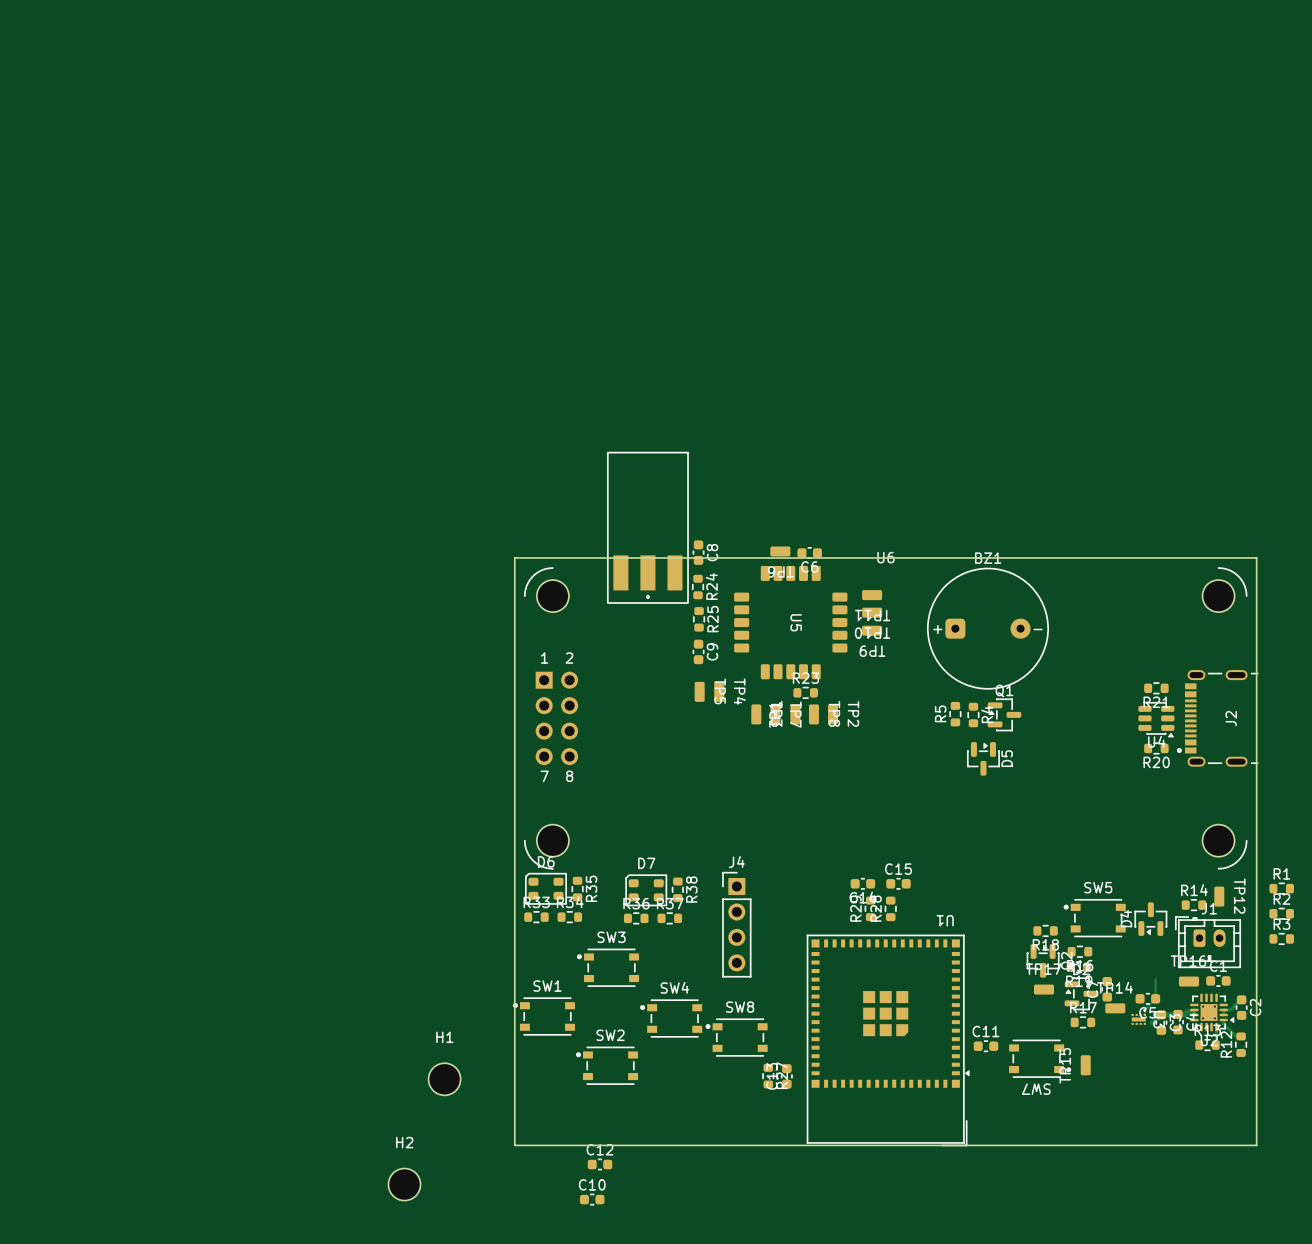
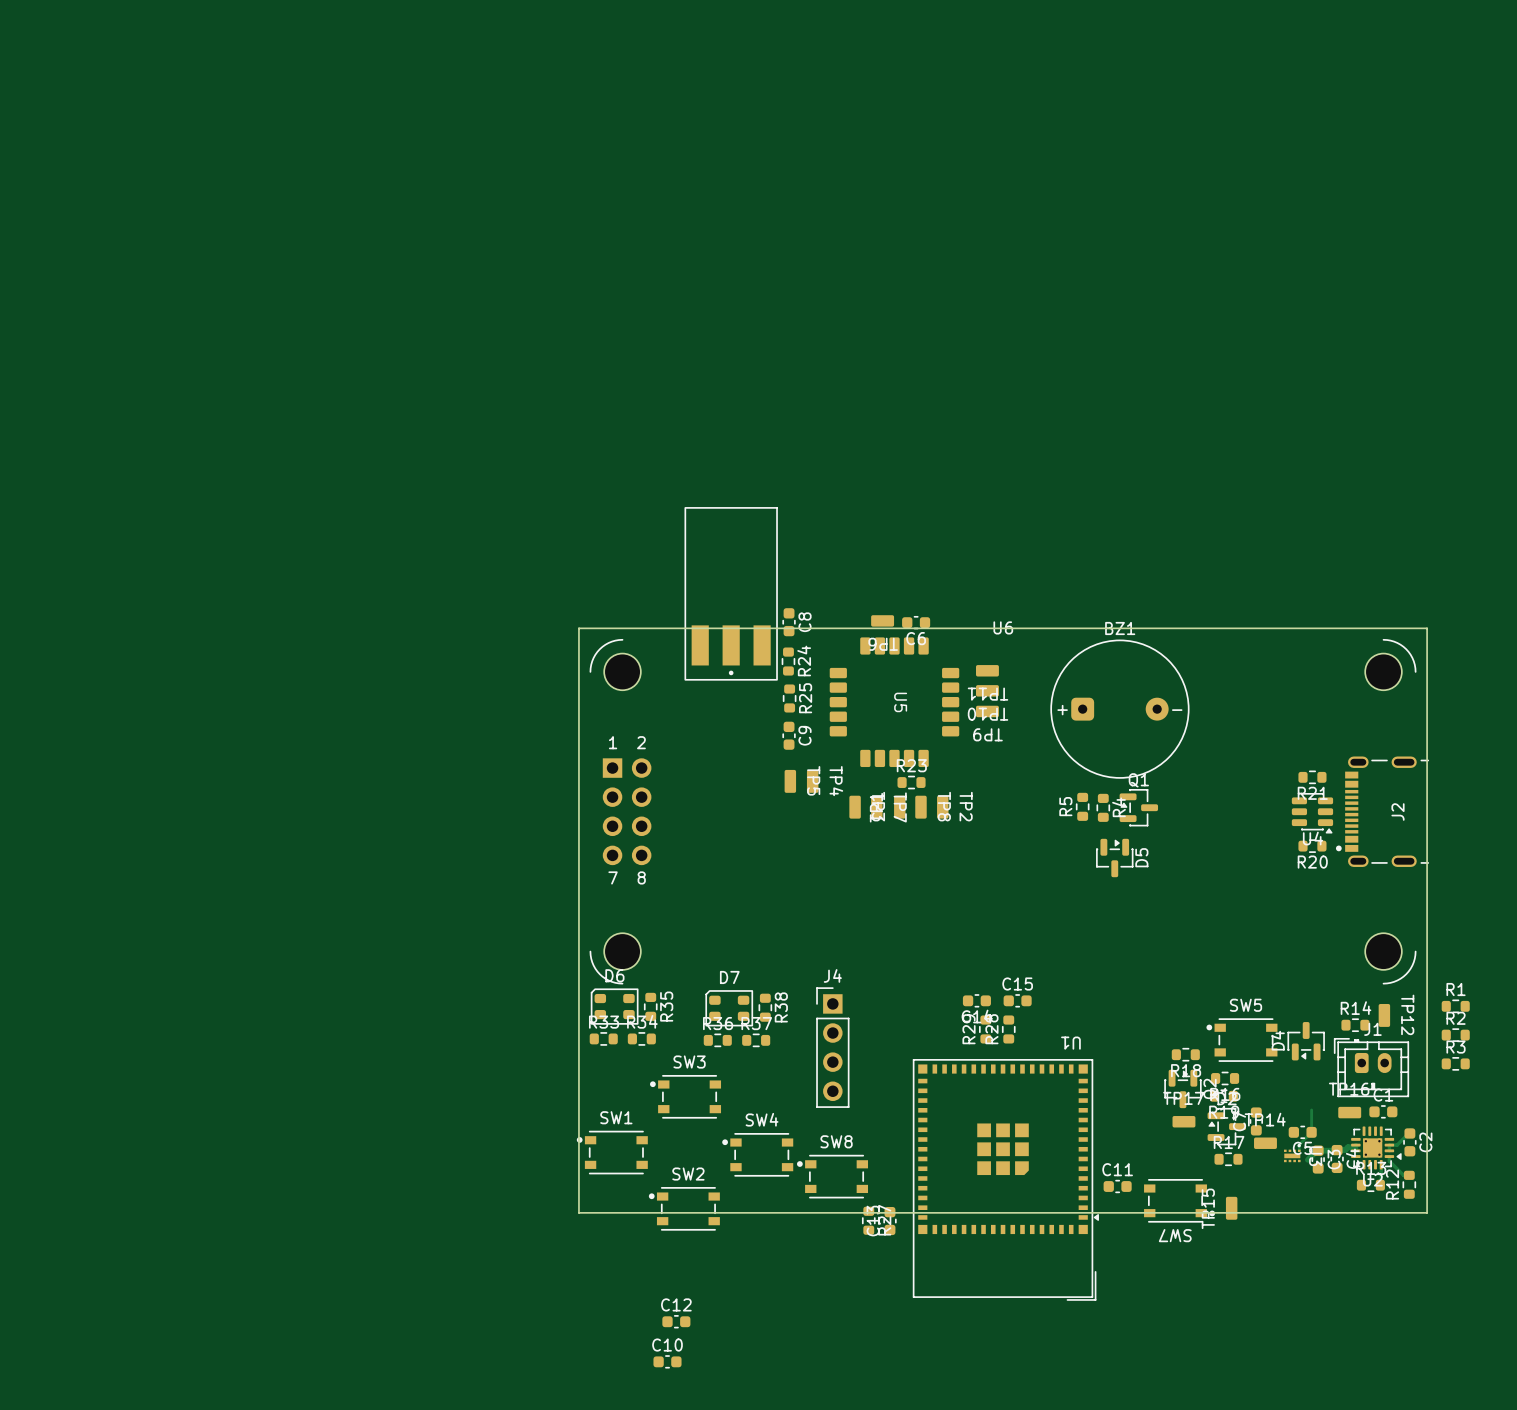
board edge: (514, 1069) (514, 1145) (1256, 1145) (1256, 1069) -> (578, 1212) (1427, 1212)
H1: (444, 1079) -> none
H2: (404, 1184) -> none

